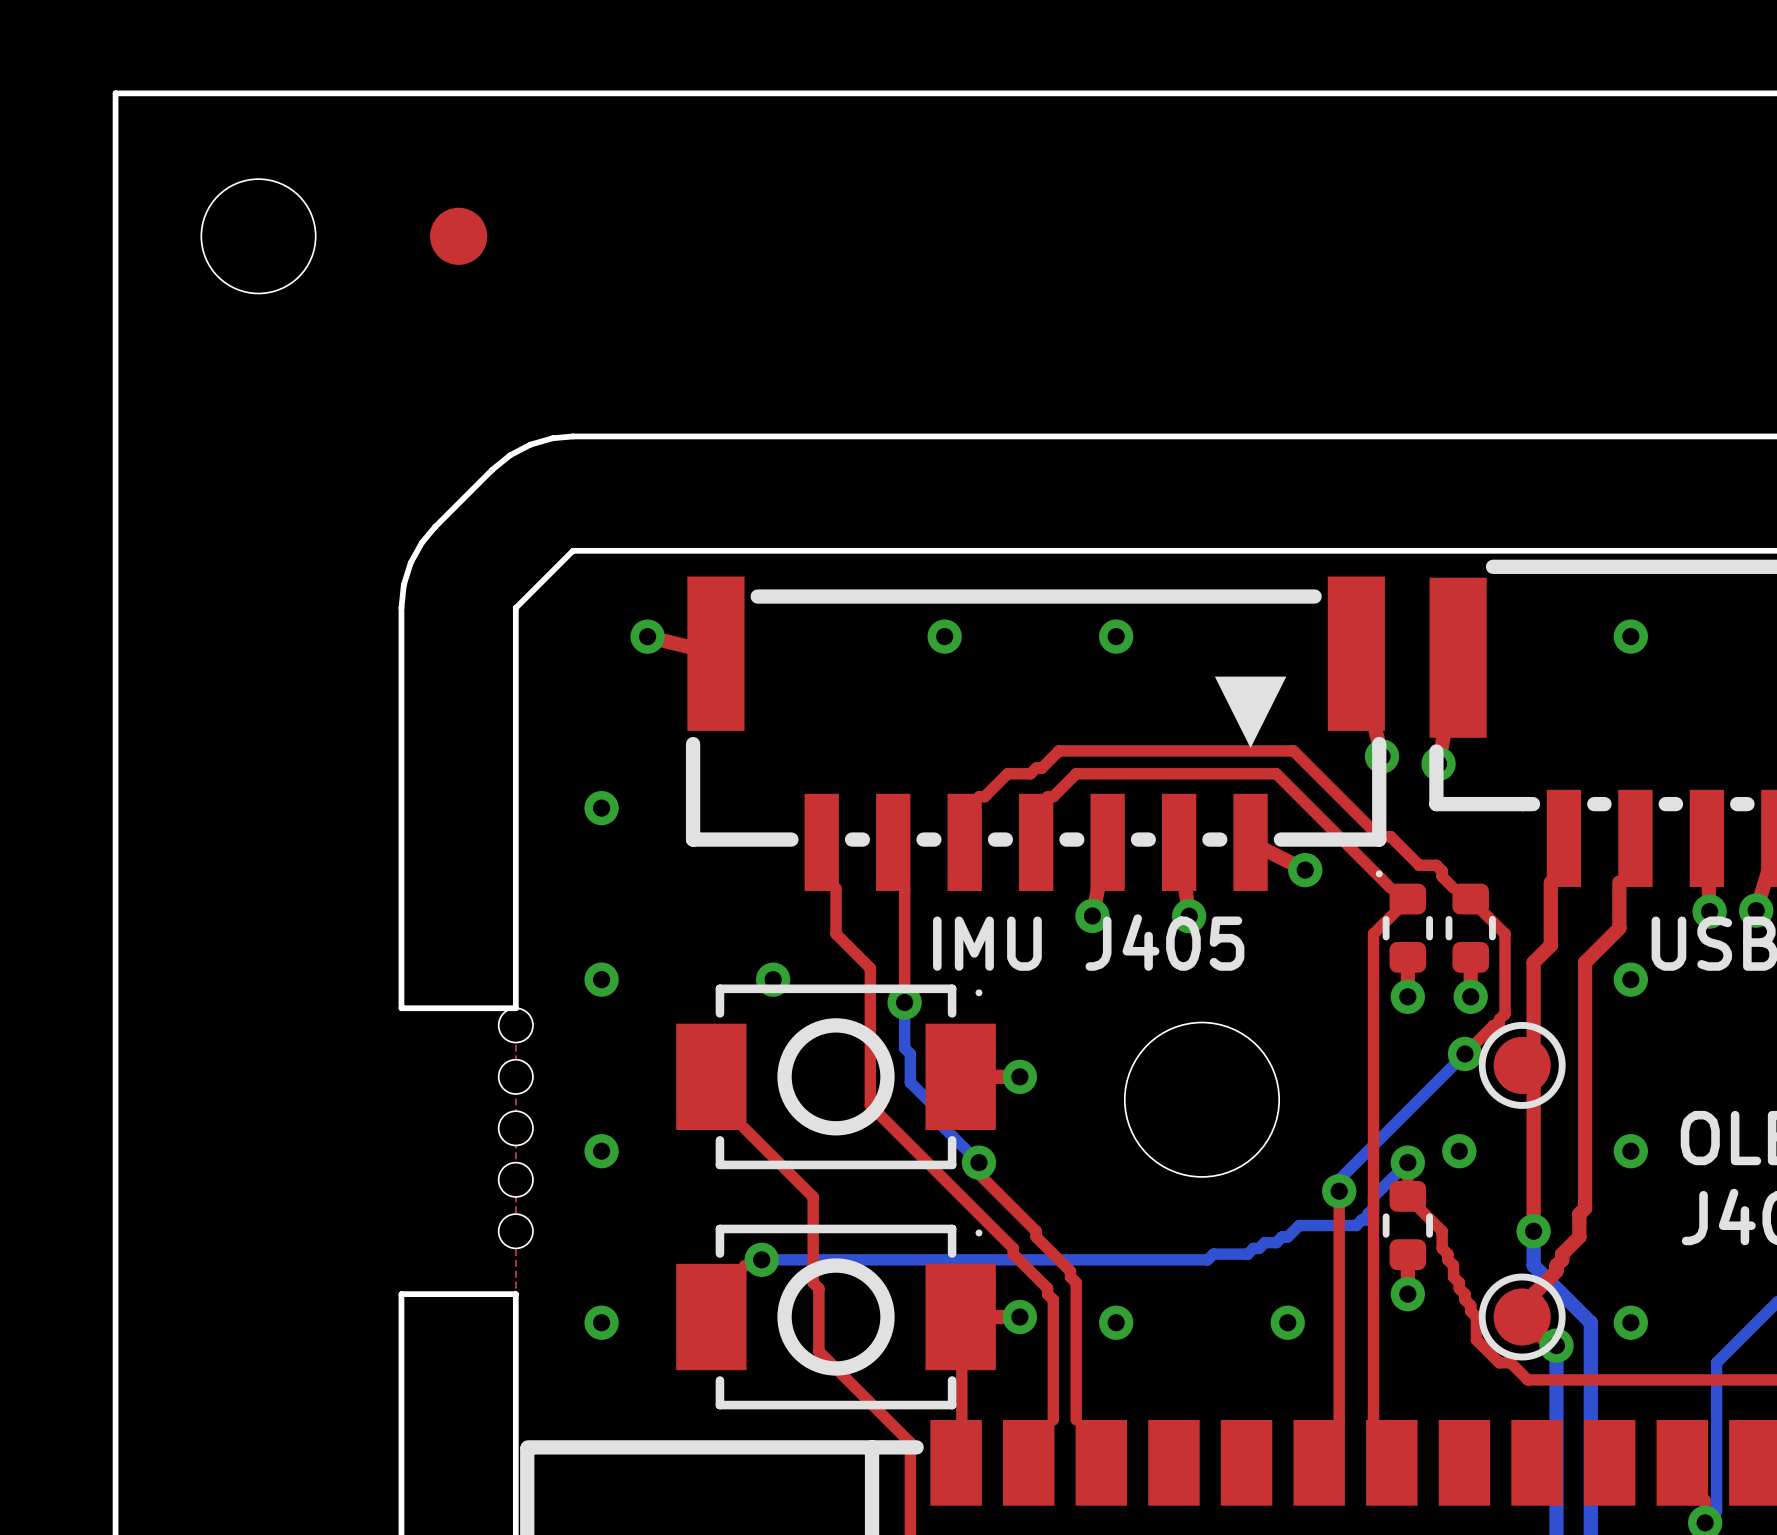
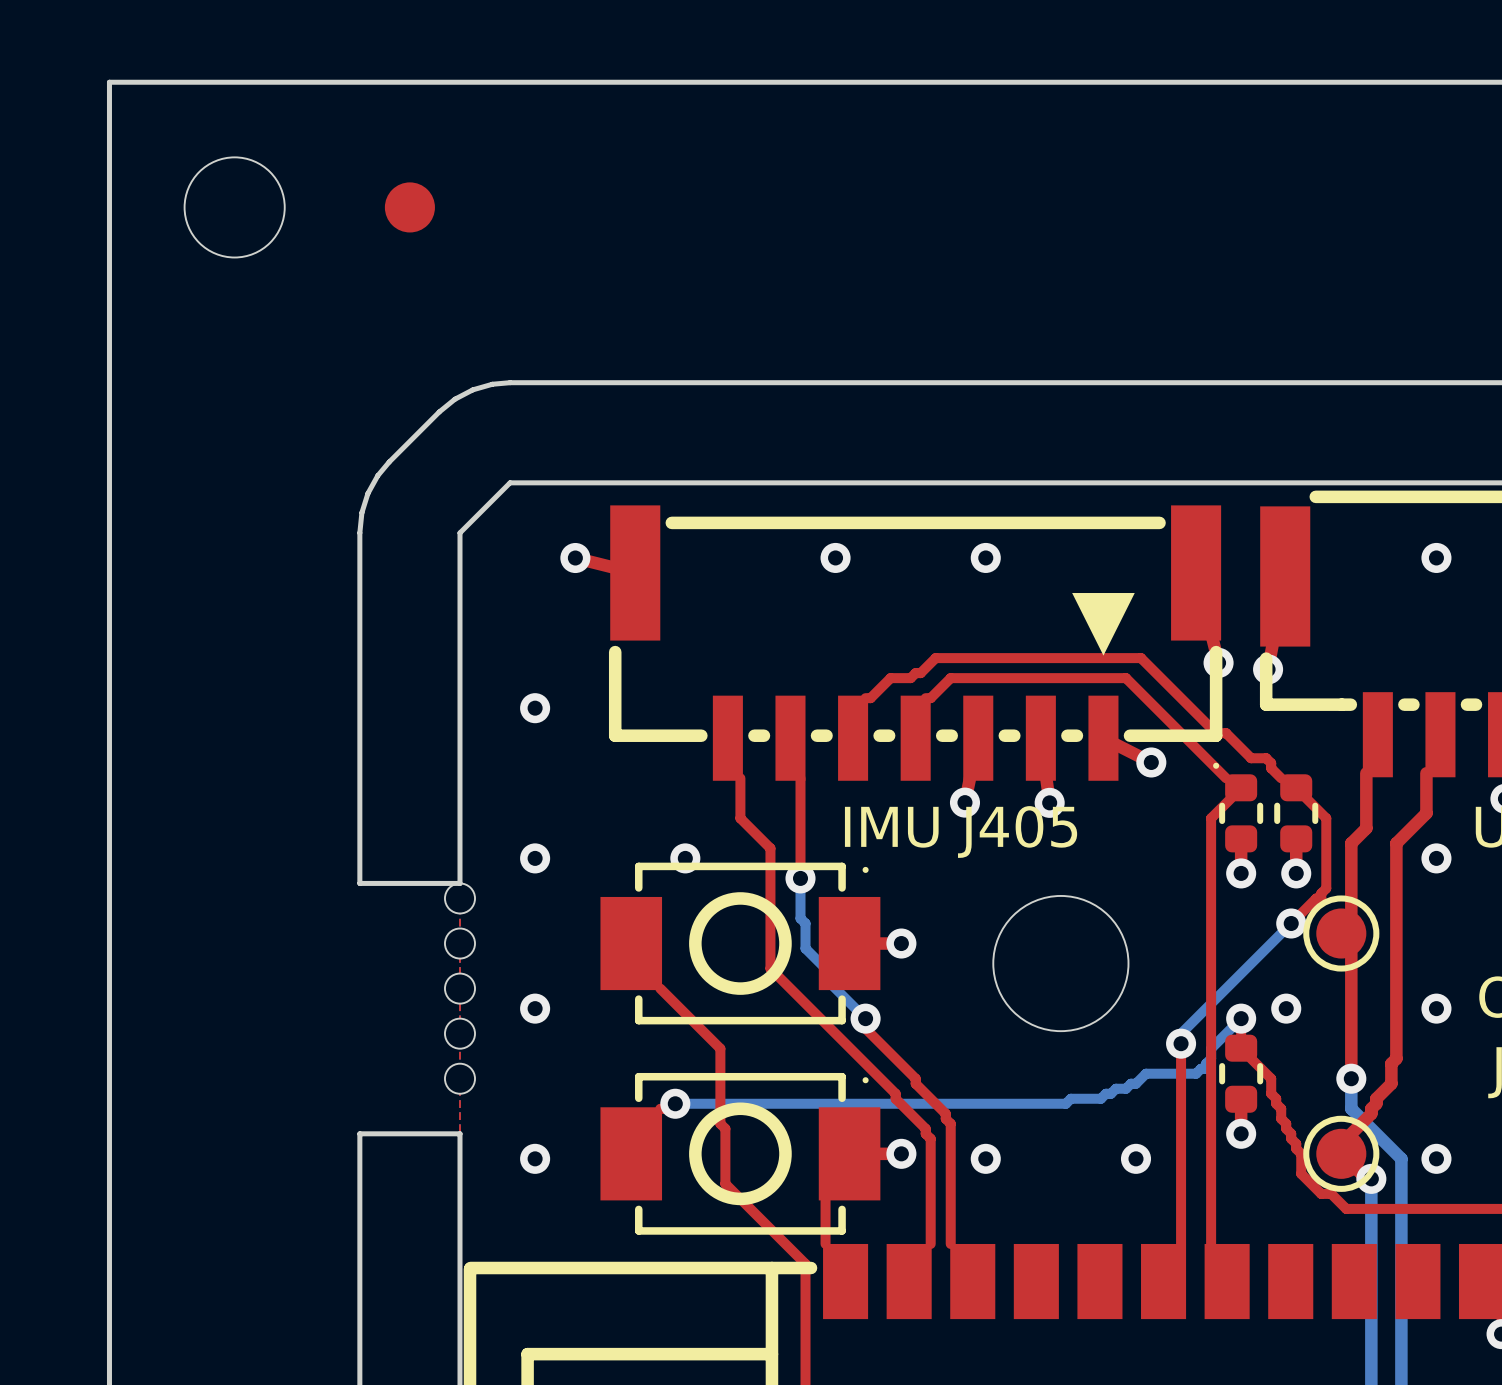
top track: (961, 1317) (961, 1419) -> none
top track: none -> (825, 1198) (825, 1243)

